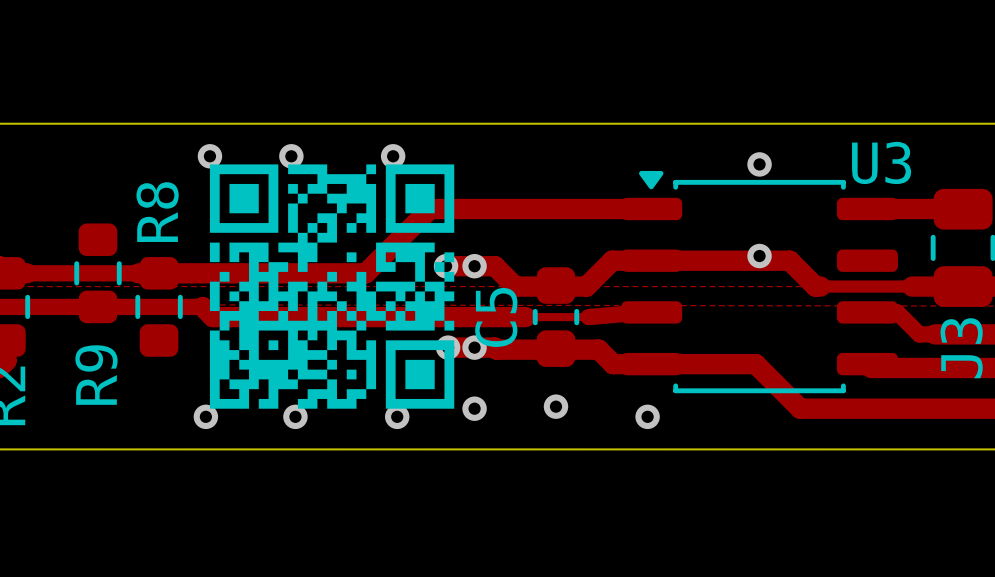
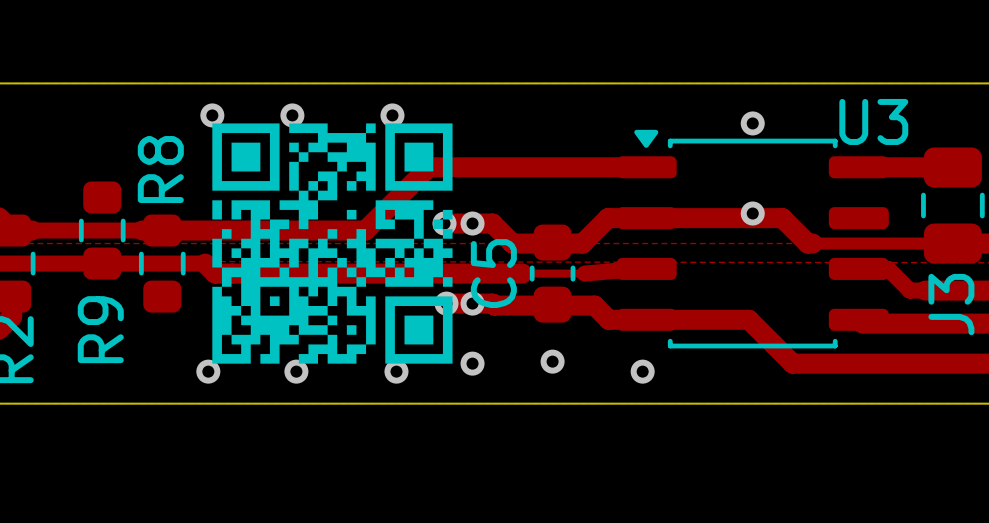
track width: thick (912, 286) (942, 286) -> thin (902, 243) (932, 243)

